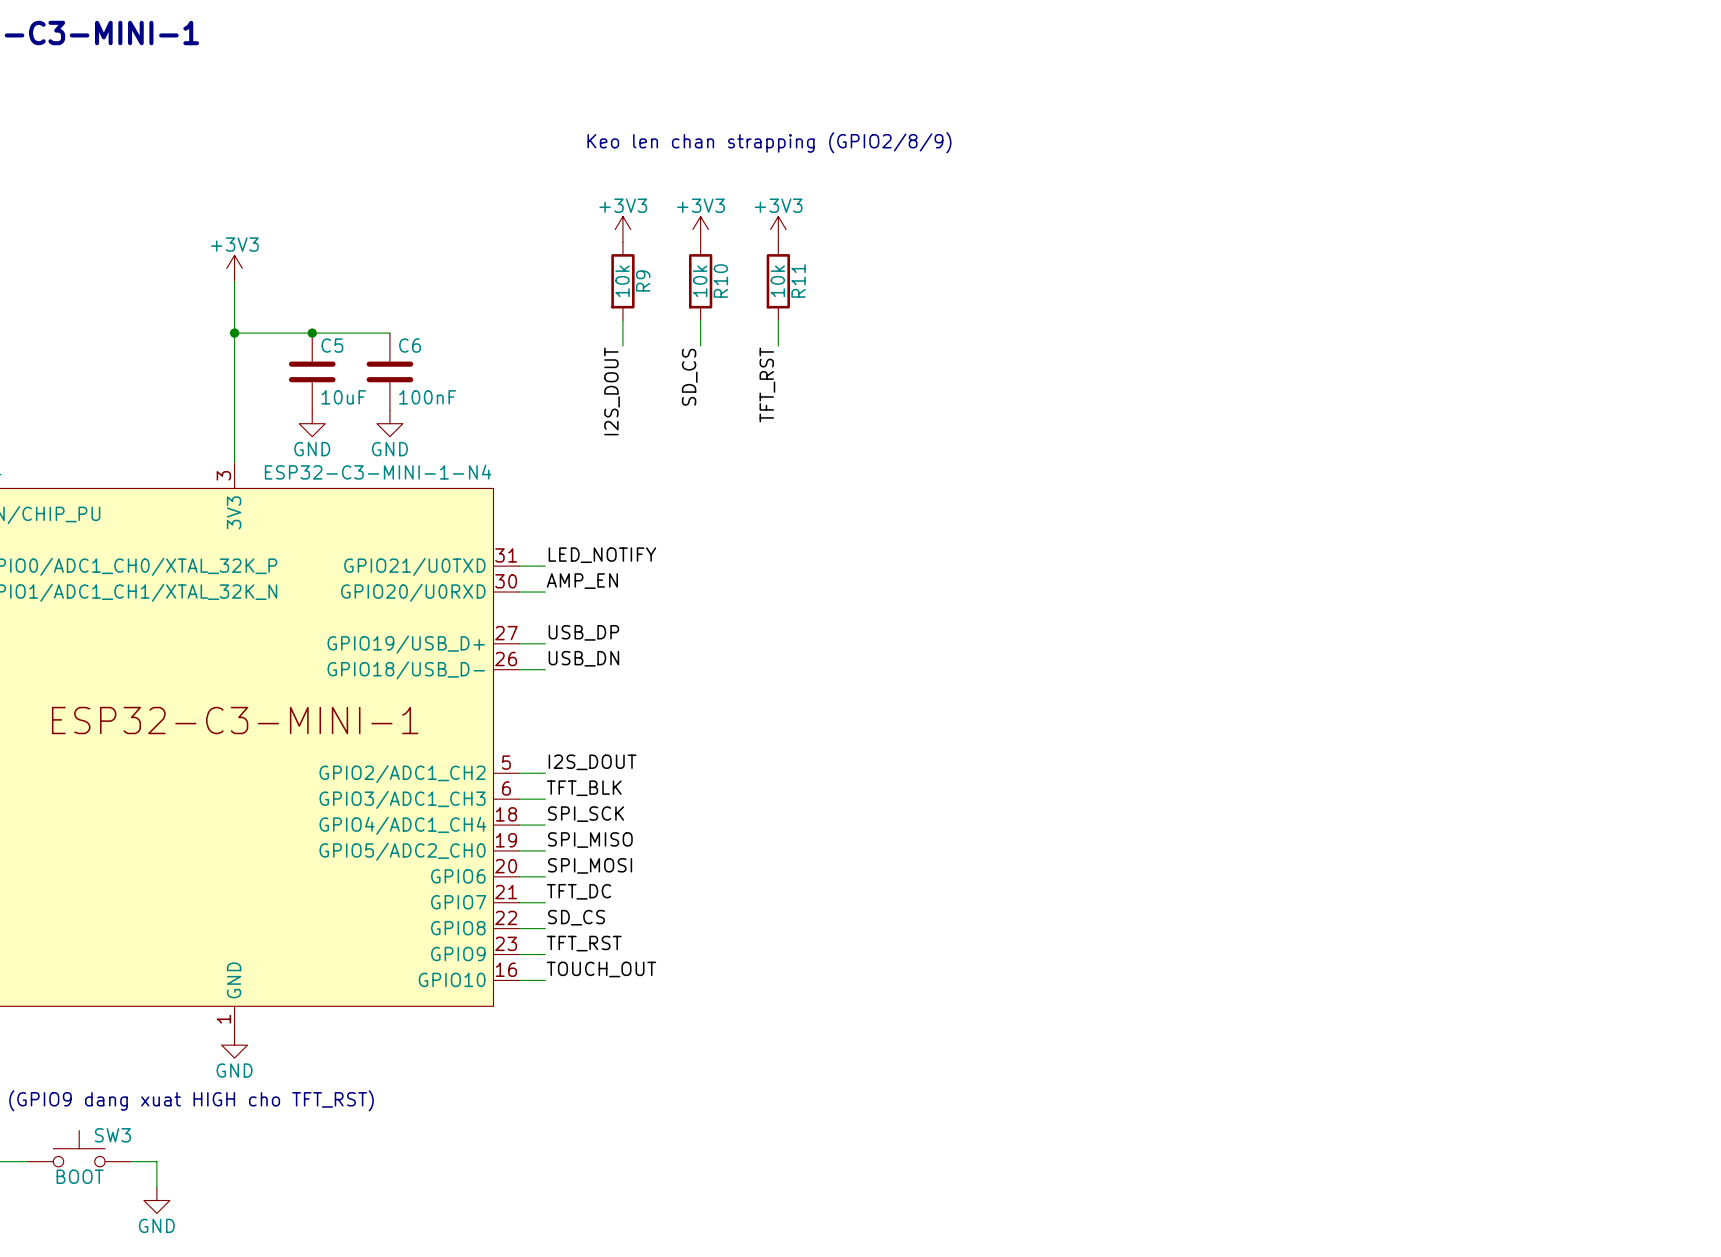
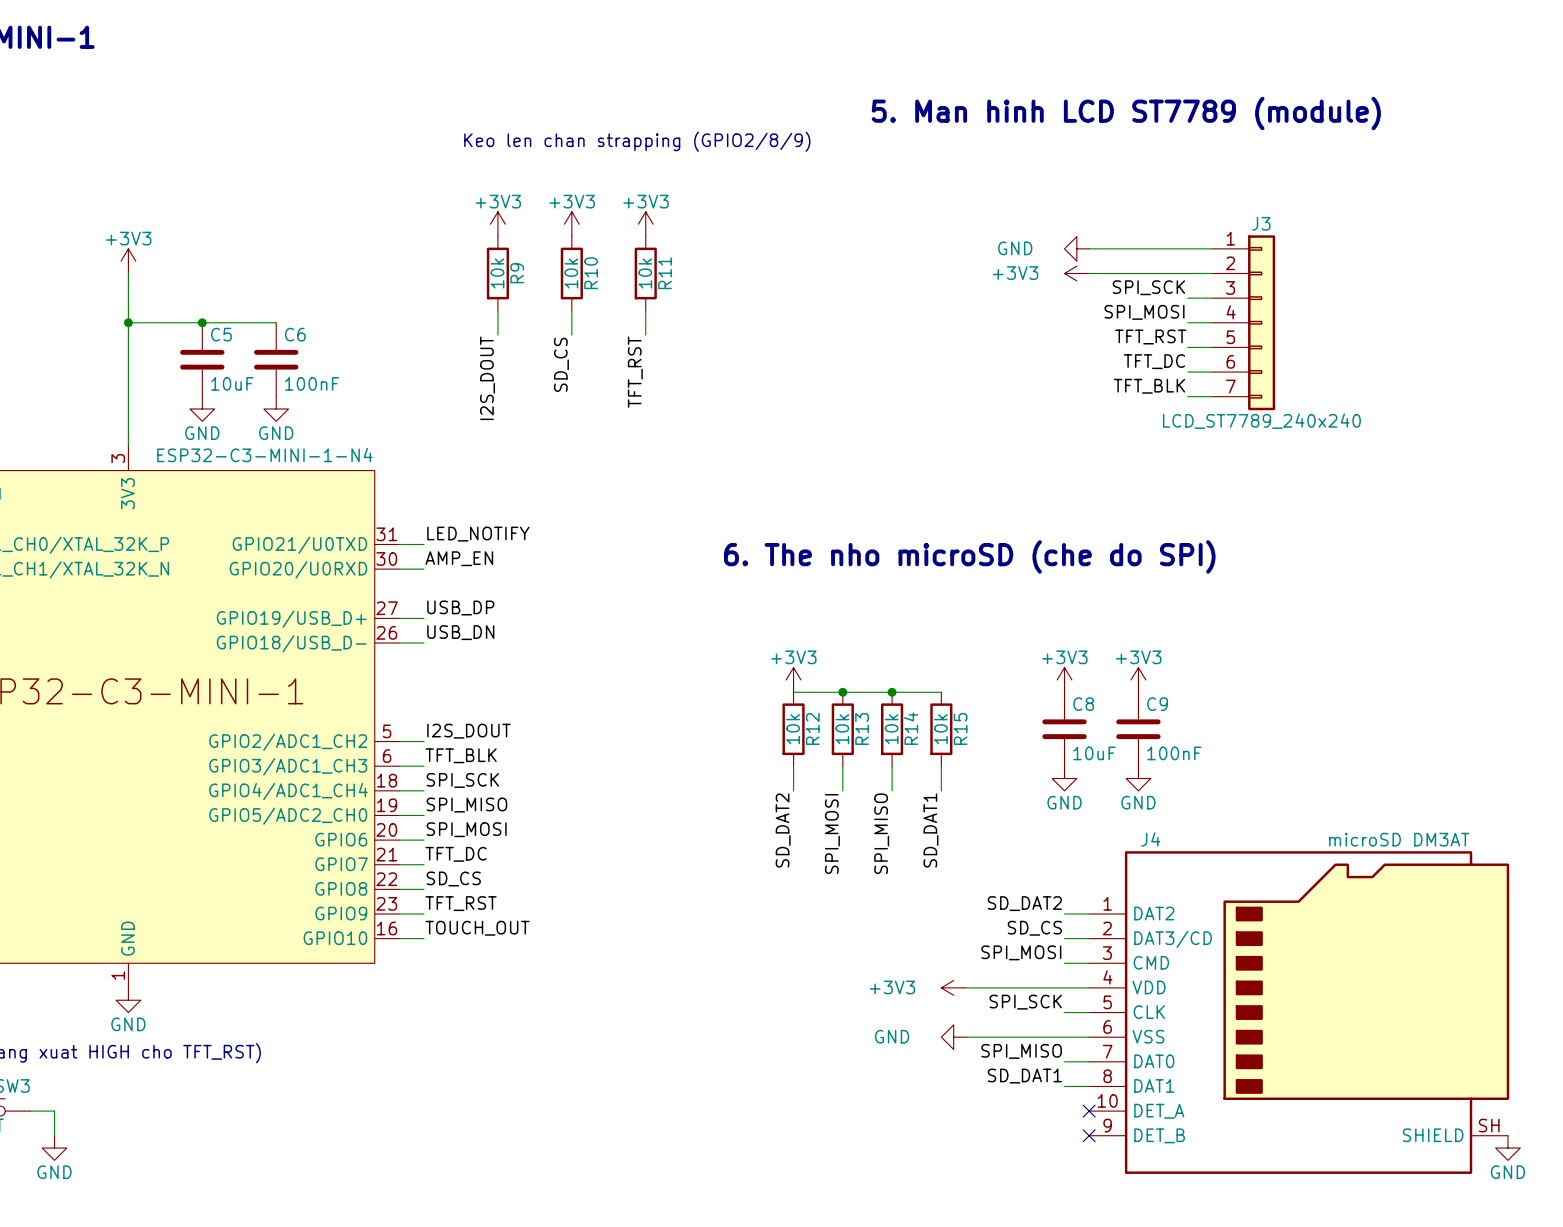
text: none -> 5. Man hinh LCD ST7789 (module) (1126, 113)
power symbol: none -> GND (1076, 248)
wire: none -> (1089, 248) (1212, 248)
power symbol: none -> +3V3 (1076, 273)
wire: none -> (1089, 273) (1212, 273)
label: none -> SPI_SCK (1148, 287)
wire: none -> (1187, 298) (1212, 298)
label: none -> SPI_MOSI (1144, 312)
wire: none -> (1187, 322) (1212, 322)
J3: none -> LCD_ST7789_240x240 (1243, 322)
label: none -> TFT_RST (1150, 337)
wire: none -> (1187, 347) (1212, 347)
label: none -> TFT_DC (1154, 361)
wire: none -> (1187, 372) (1212, 372)
label: none -> TFT_BLK (1149, 386)
wire: none -> (1187, 396) (1212, 396)
text: none -> 6. The nho microSD (che do SPI) (969, 556)
power symbol: none -> +3V3 (793, 679)
power symbol: none -> +3V3 (1064, 679)
power symbol: none -> +3V3 (1138, 679)
wire: none -> (793, 692) (941, 692)
junction: none -> (842, 692)
junction: none -> (892, 692)
R12: none -> 10k (793, 729)
R13: none -> 10k (842, 729)
R14: none -> 10k (892, 729)
R15: none -> 10k (941, 729)
C8: none -> 10uF (1064, 729)
C9: none -> 100nF (1138, 729)
wire: none -> (793, 766) (793, 790)
wire: none -> (842, 766) (842, 790)
wire: none -> (892, 766) (892, 790)
wire: none -> (941, 766) (941, 790)
power symbol: none -> GND (1064, 778)
power symbol: none -> GND (1138, 778)
label: none -> SD_DAT2 (783, 830)
label: none -> SD_DAT1 (930, 830)
label: none -> SPI_MOSI (832, 834)
label: none -> SPI_MISO (881, 833)
label: none -> SD_DAT2 (1024, 903)
wire: none -> (1064, 914) (1089, 914)
label: none -> SD_CS (1034, 928)
wire: none -> (1064, 938) (1089, 938)
label: none -> SPI_MOSI (1021, 952)
wire: none -> (1064, 963) (1089, 963)
power symbol: none -> +3V3 (953, 987)
wire: none -> (965, 987) (1089, 987)
label: none -> SPI_SCK (1025, 1002)
wire: none -> (1064, 1012) (1089, 1012)
J4: none -> microSD DM3AT (1299, 1012)
power symbol: none -> GND (953, 1037)
wire: none -> (965, 1037) (1089, 1037)
label: none -> SPI_MISO (1021, 1051)
wire: none -> (1064, 1061) (1089, 1061)
label: none -> SD_DAT1 (1024, 1076)
wire: none -> (1064, 1086) (1089, 1086)
no-connect mark: none -> (1089, 1111)
no-connect mark: none -> (1089, 1135)
power symbol: none -> GND (1507, 1148)

